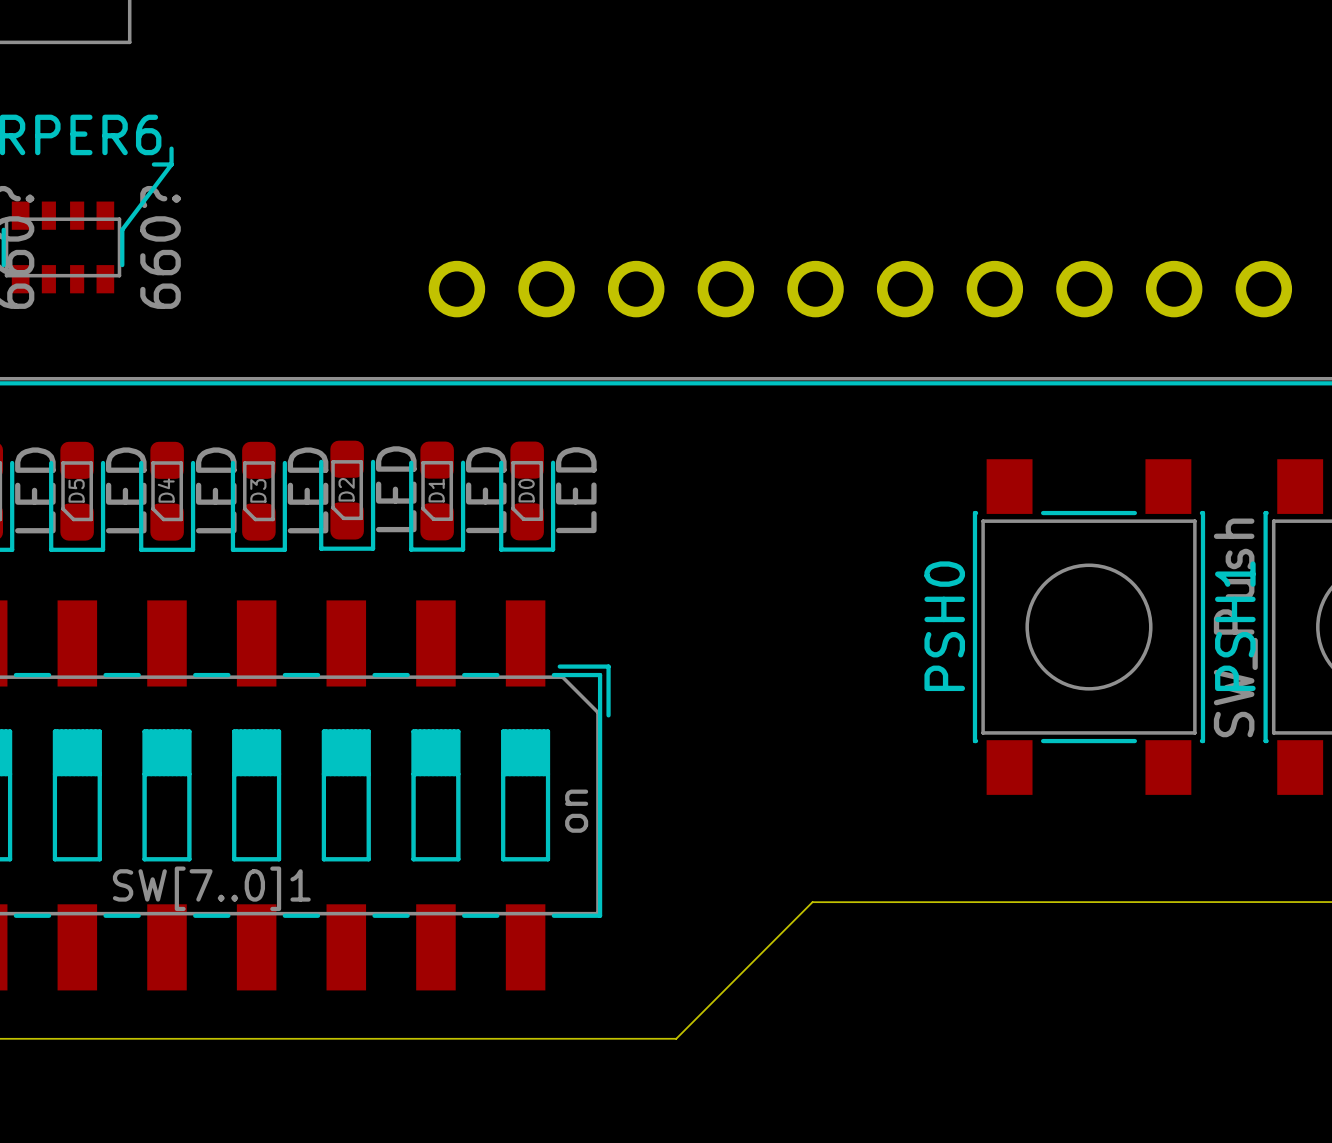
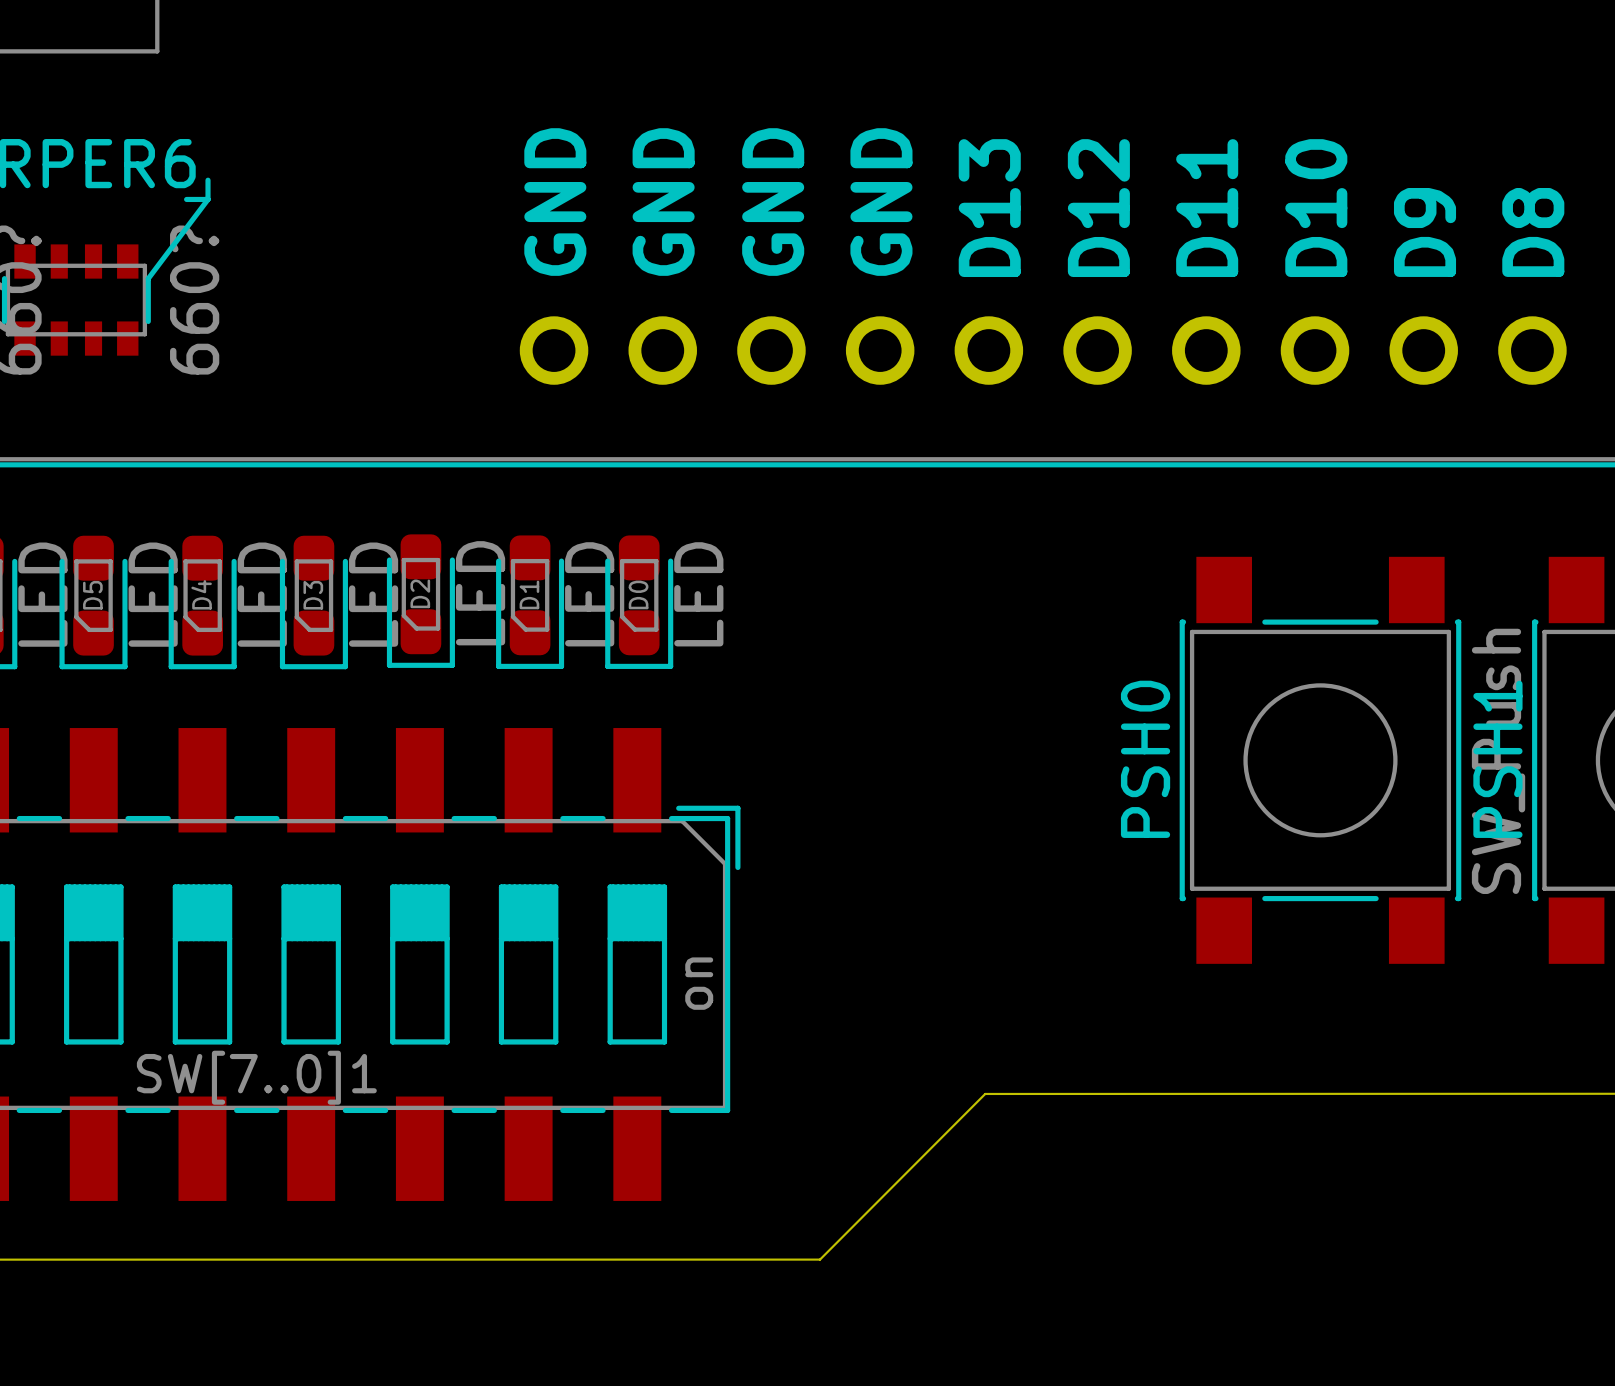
text: none -> GND (555, 202)
text: none -> GND (663, 202)
text: none -> GND (773, 202)
text: none -> GND (881, 202)
text: none -> D13 (989, 208)
text: none -> D12 (1098, 208)
text: none -> D11 (1207, 208)
text: none -> D10 (1316, 208)
text: none -> D9 (1425, 232)
text: none -> D8 (1533, 232)

